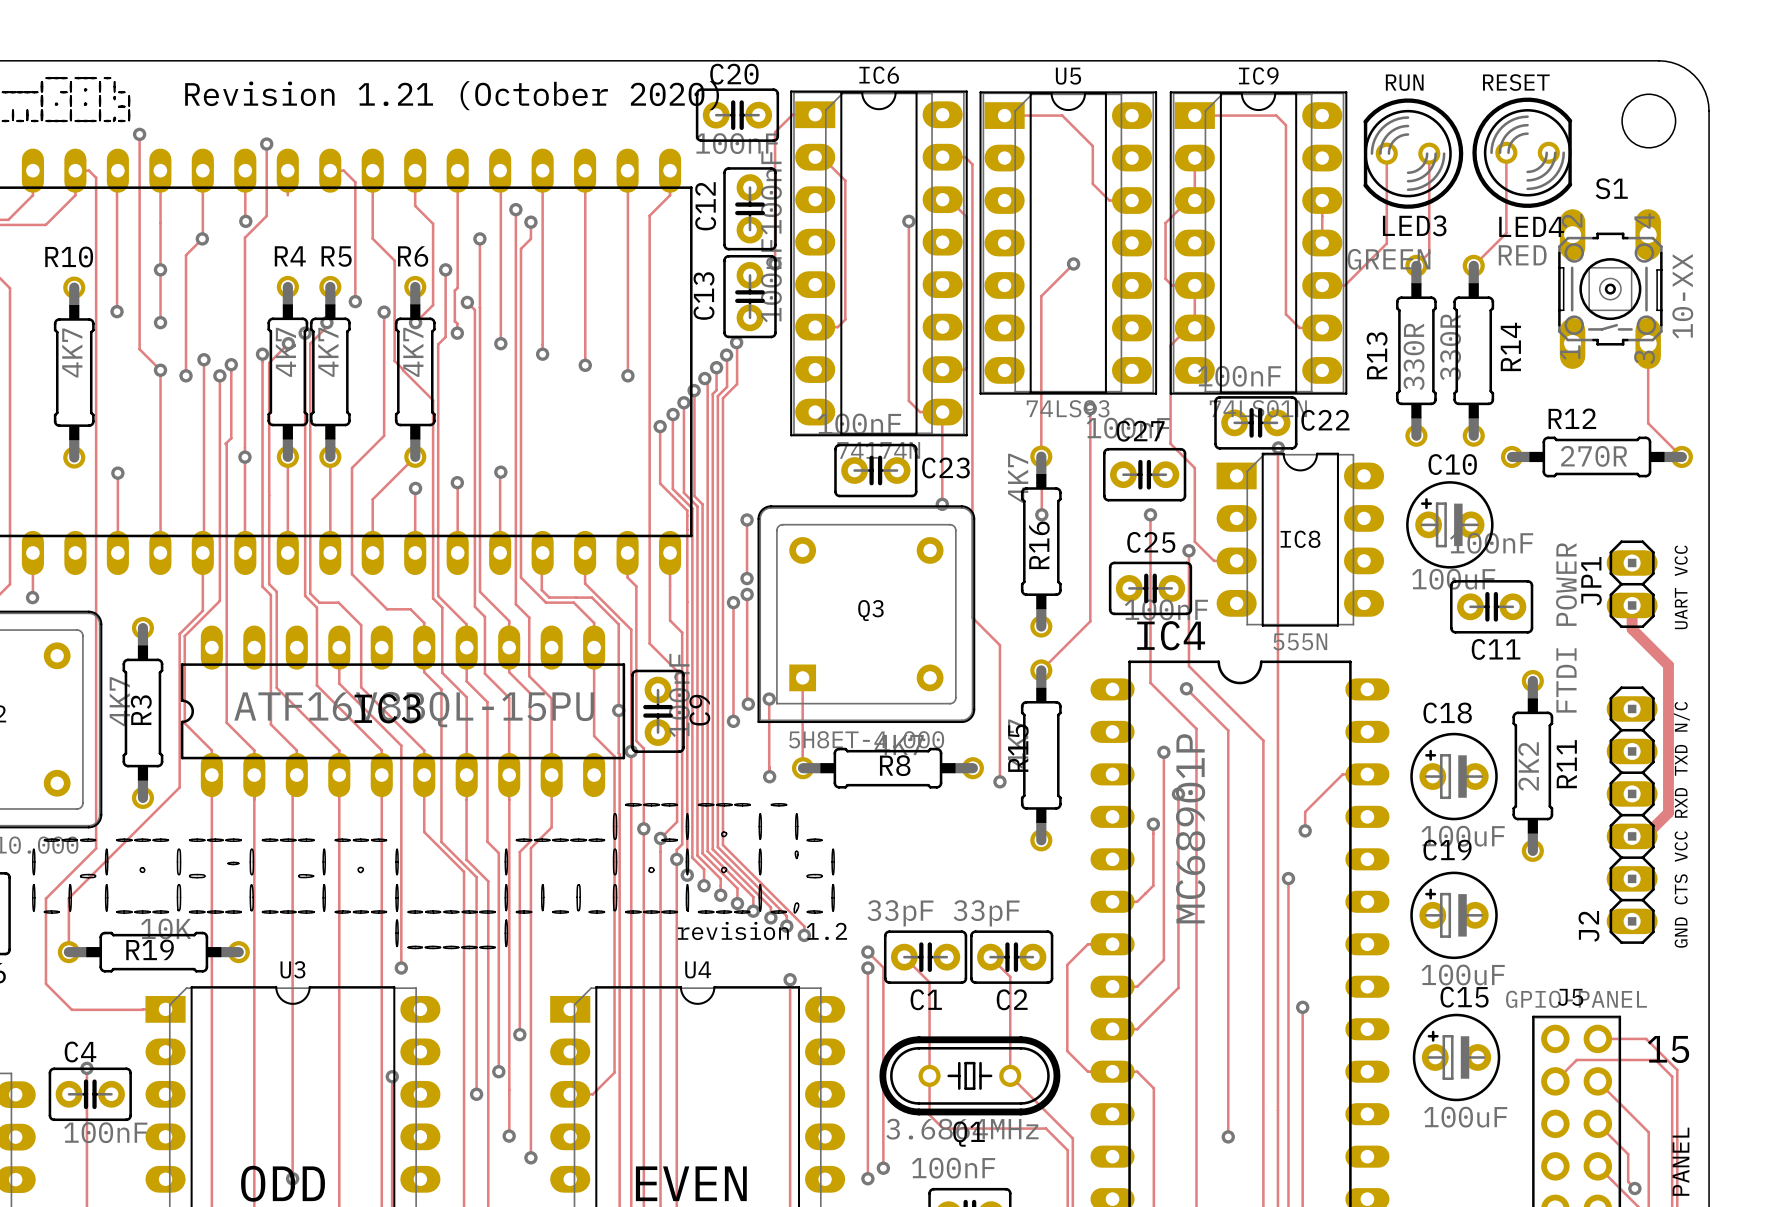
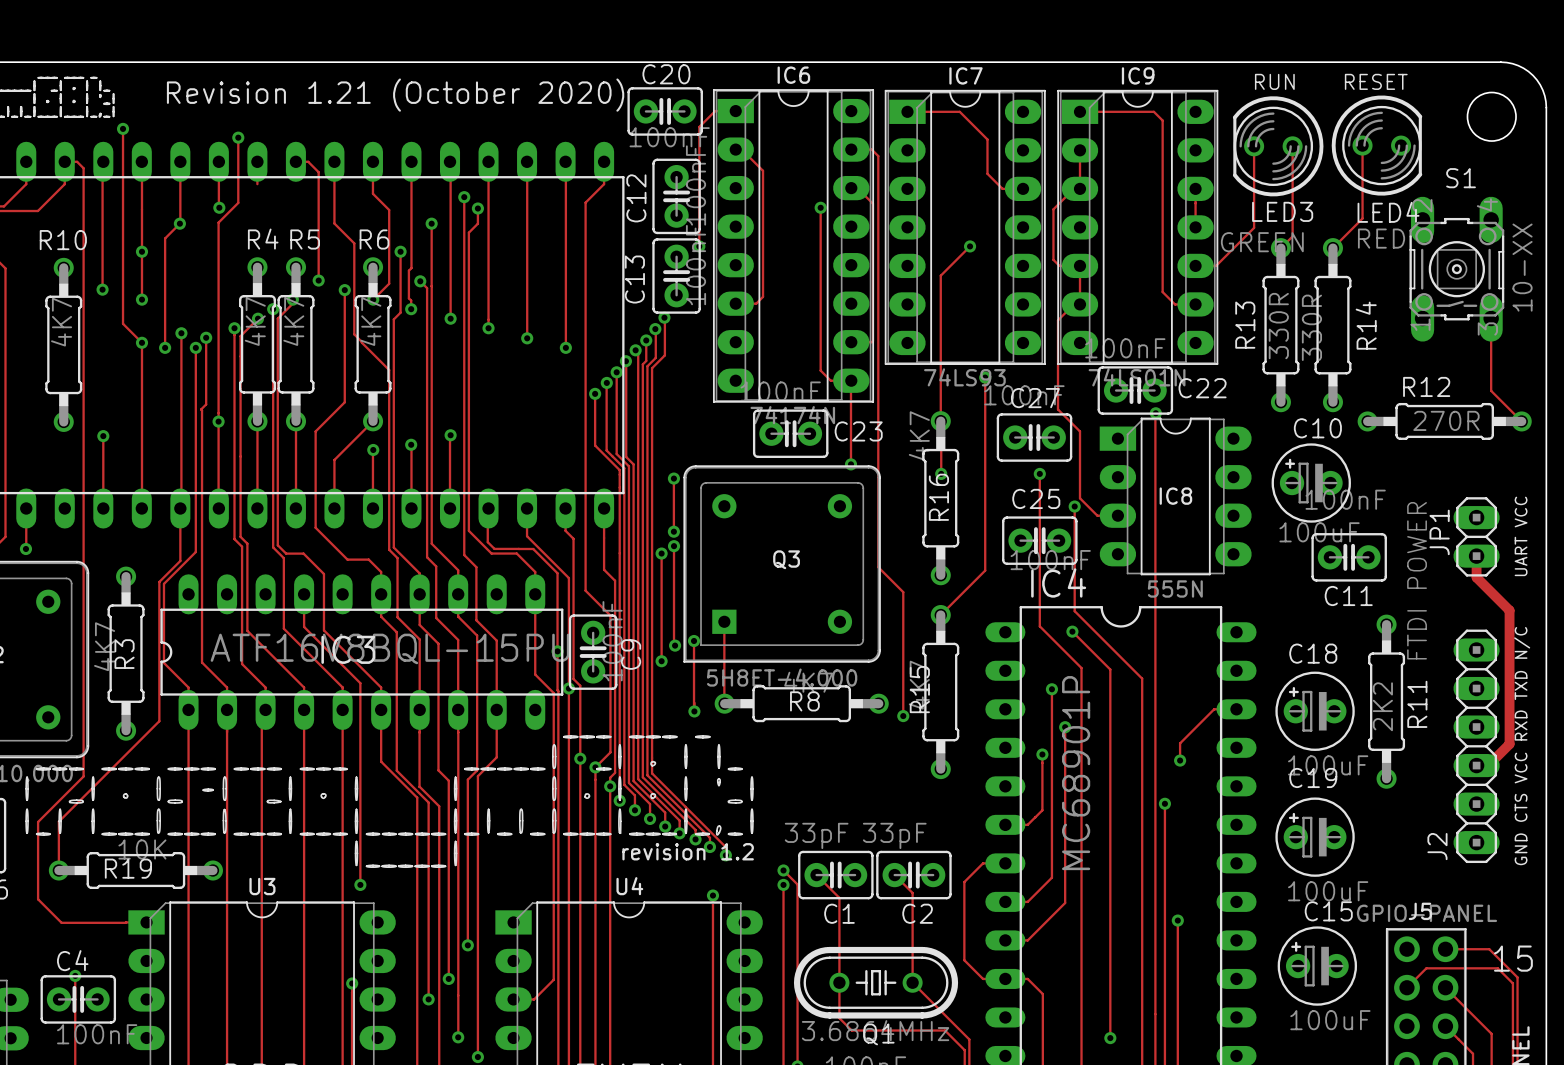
U5 name: U5 (1068, 76) -> IC7 (965, 75)

